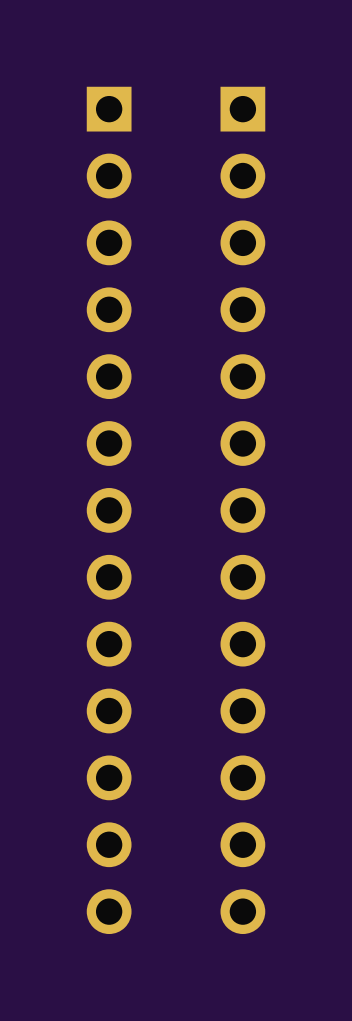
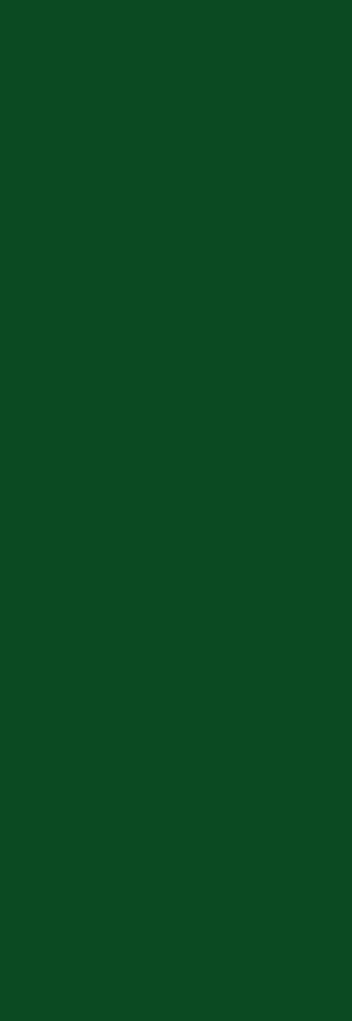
part: (109, 510) -> none
part: (242, 510) -> none

